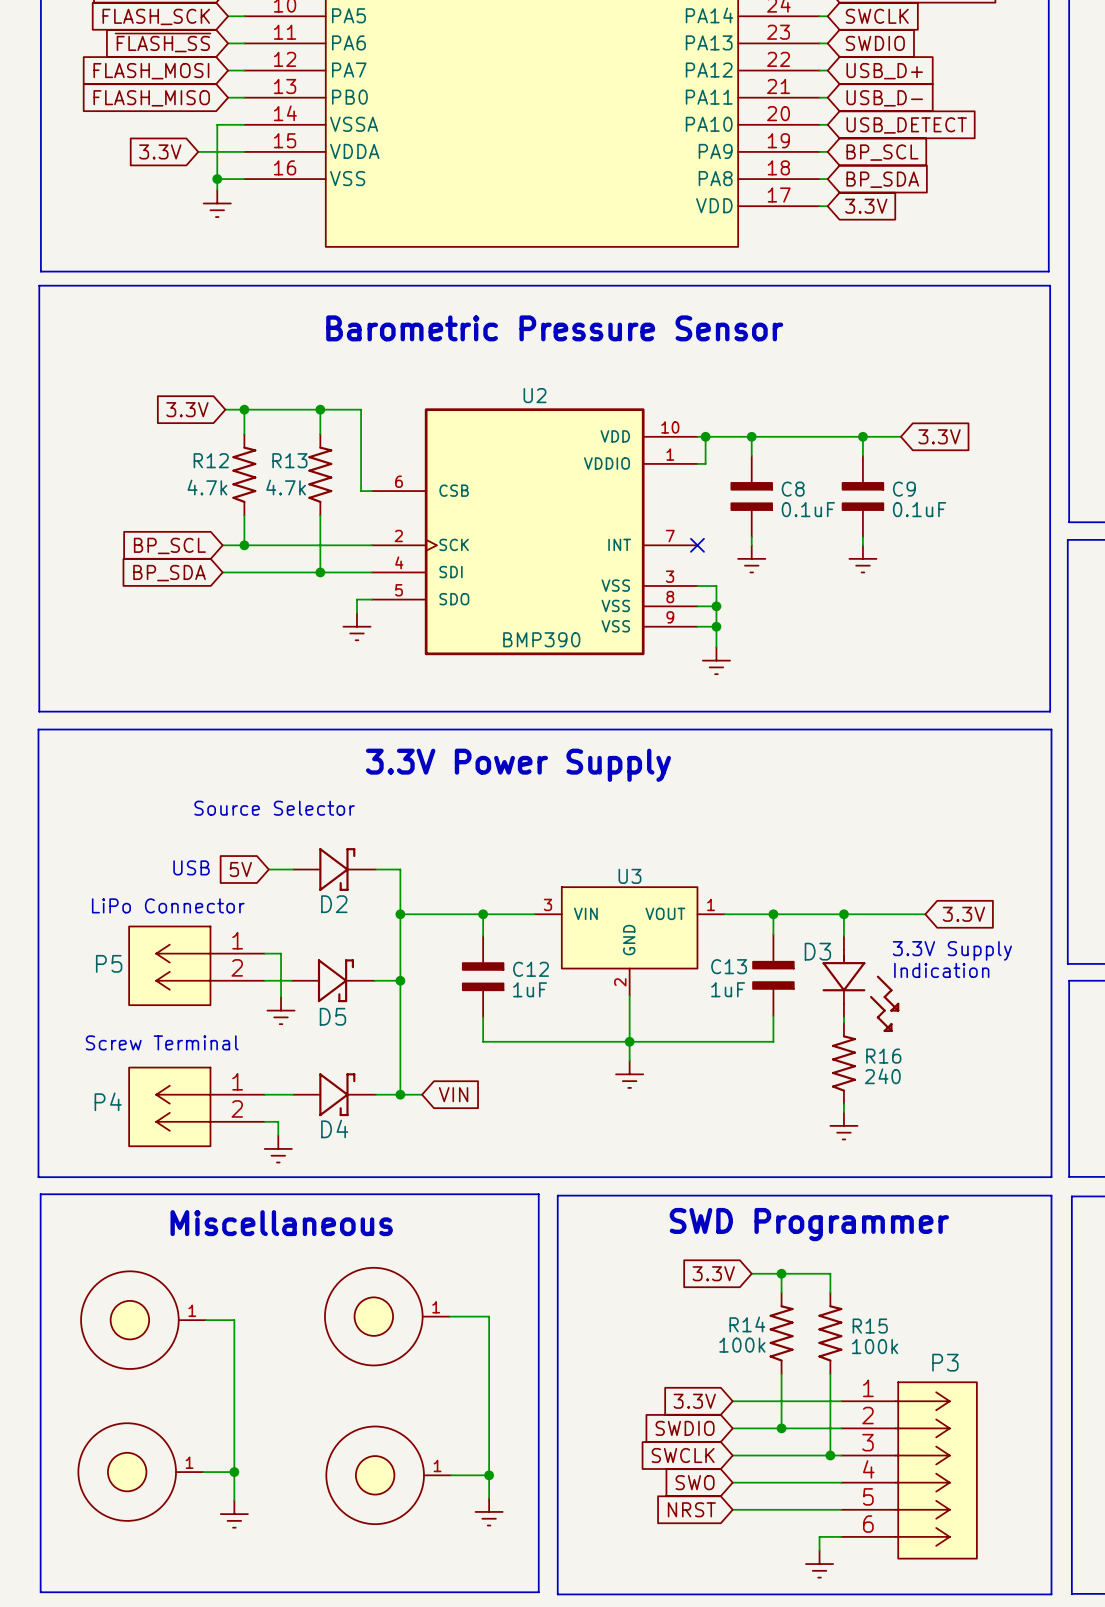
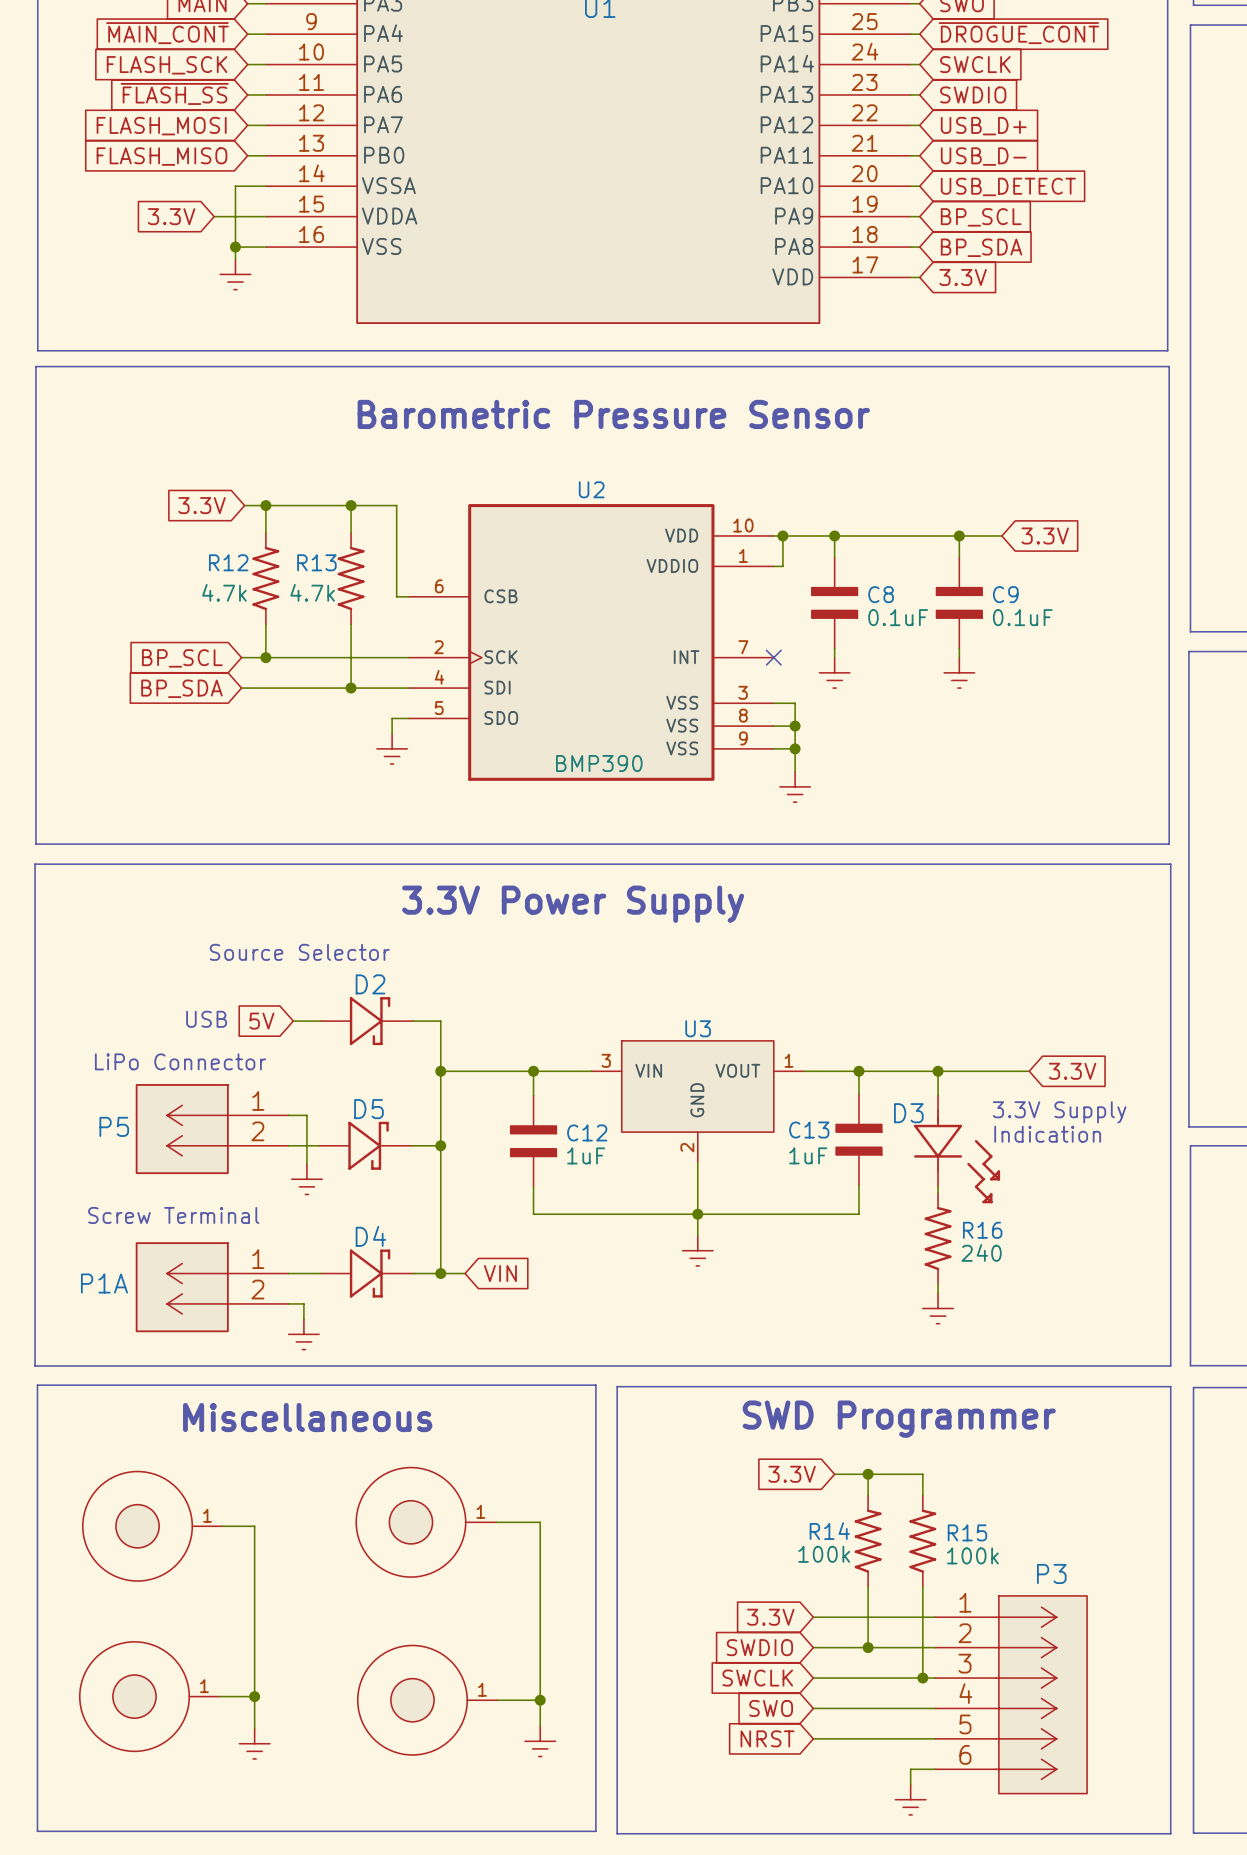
D2 name position: D2 (334, 904) -> D2 (370, 984)
D5 name position: D5 (332, 1016) -> D5 (368, 1109)
P4 name: P4 (108, 1101) -> P1A (104, 1283)
D4 name position: D4 (334, 1128) -> D4 (370, 1236)

